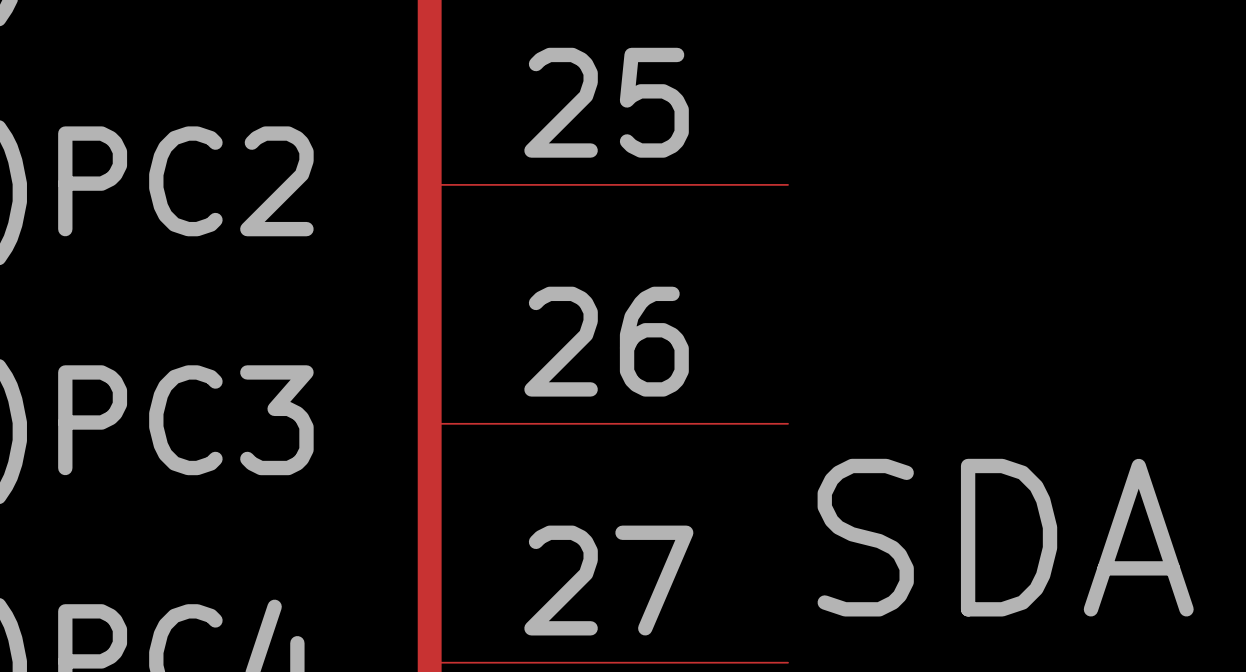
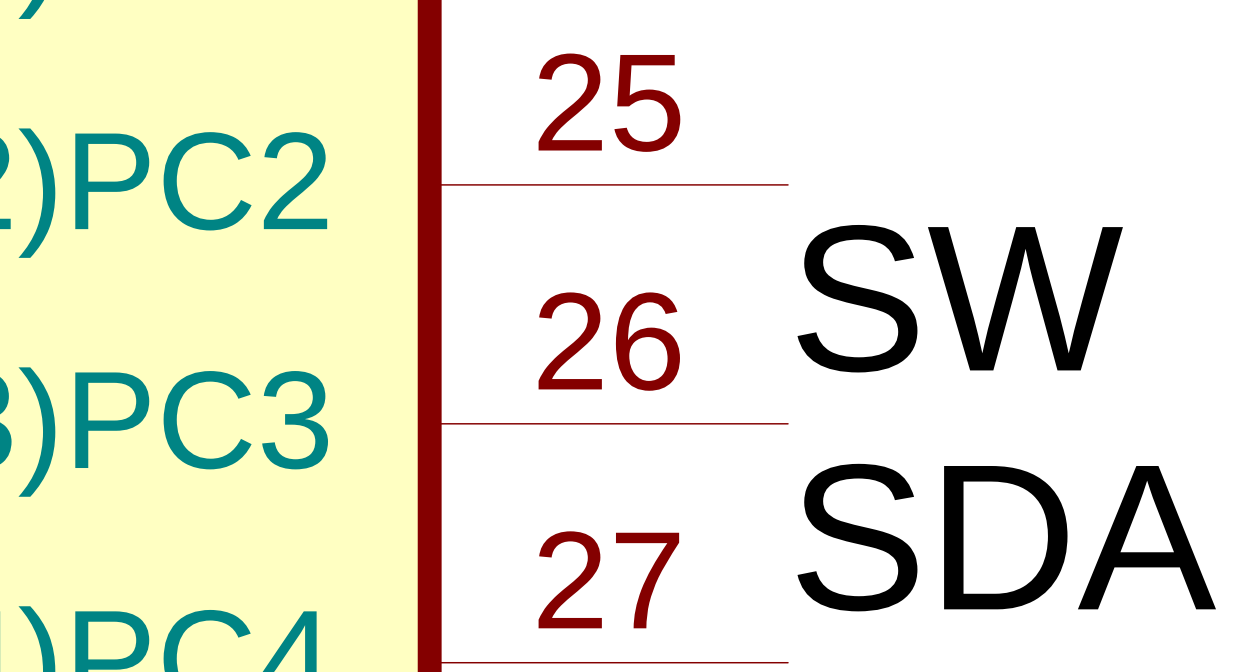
label: none -> SW (960, 298)

